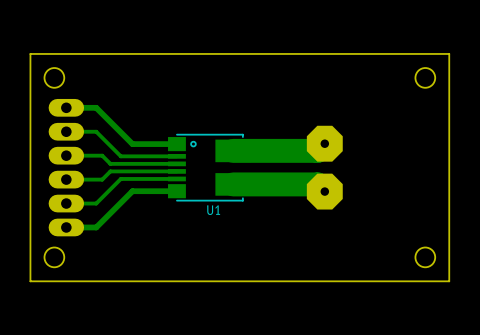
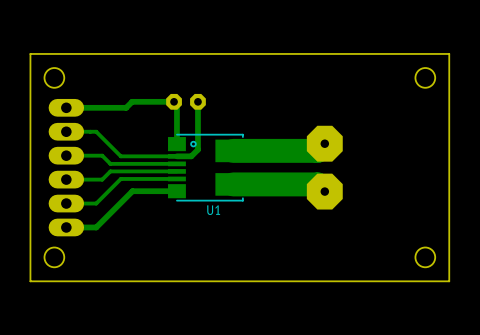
part: none -> (186, 101)
track: none -> (197, 101) (197, 149) (191, 156) (176, 156)
track: (96, 107) (132, 144) (176, 144) -> (96, 107) (126, 107) (132, 101) (174, 101) (176, 104) (176, 144)

